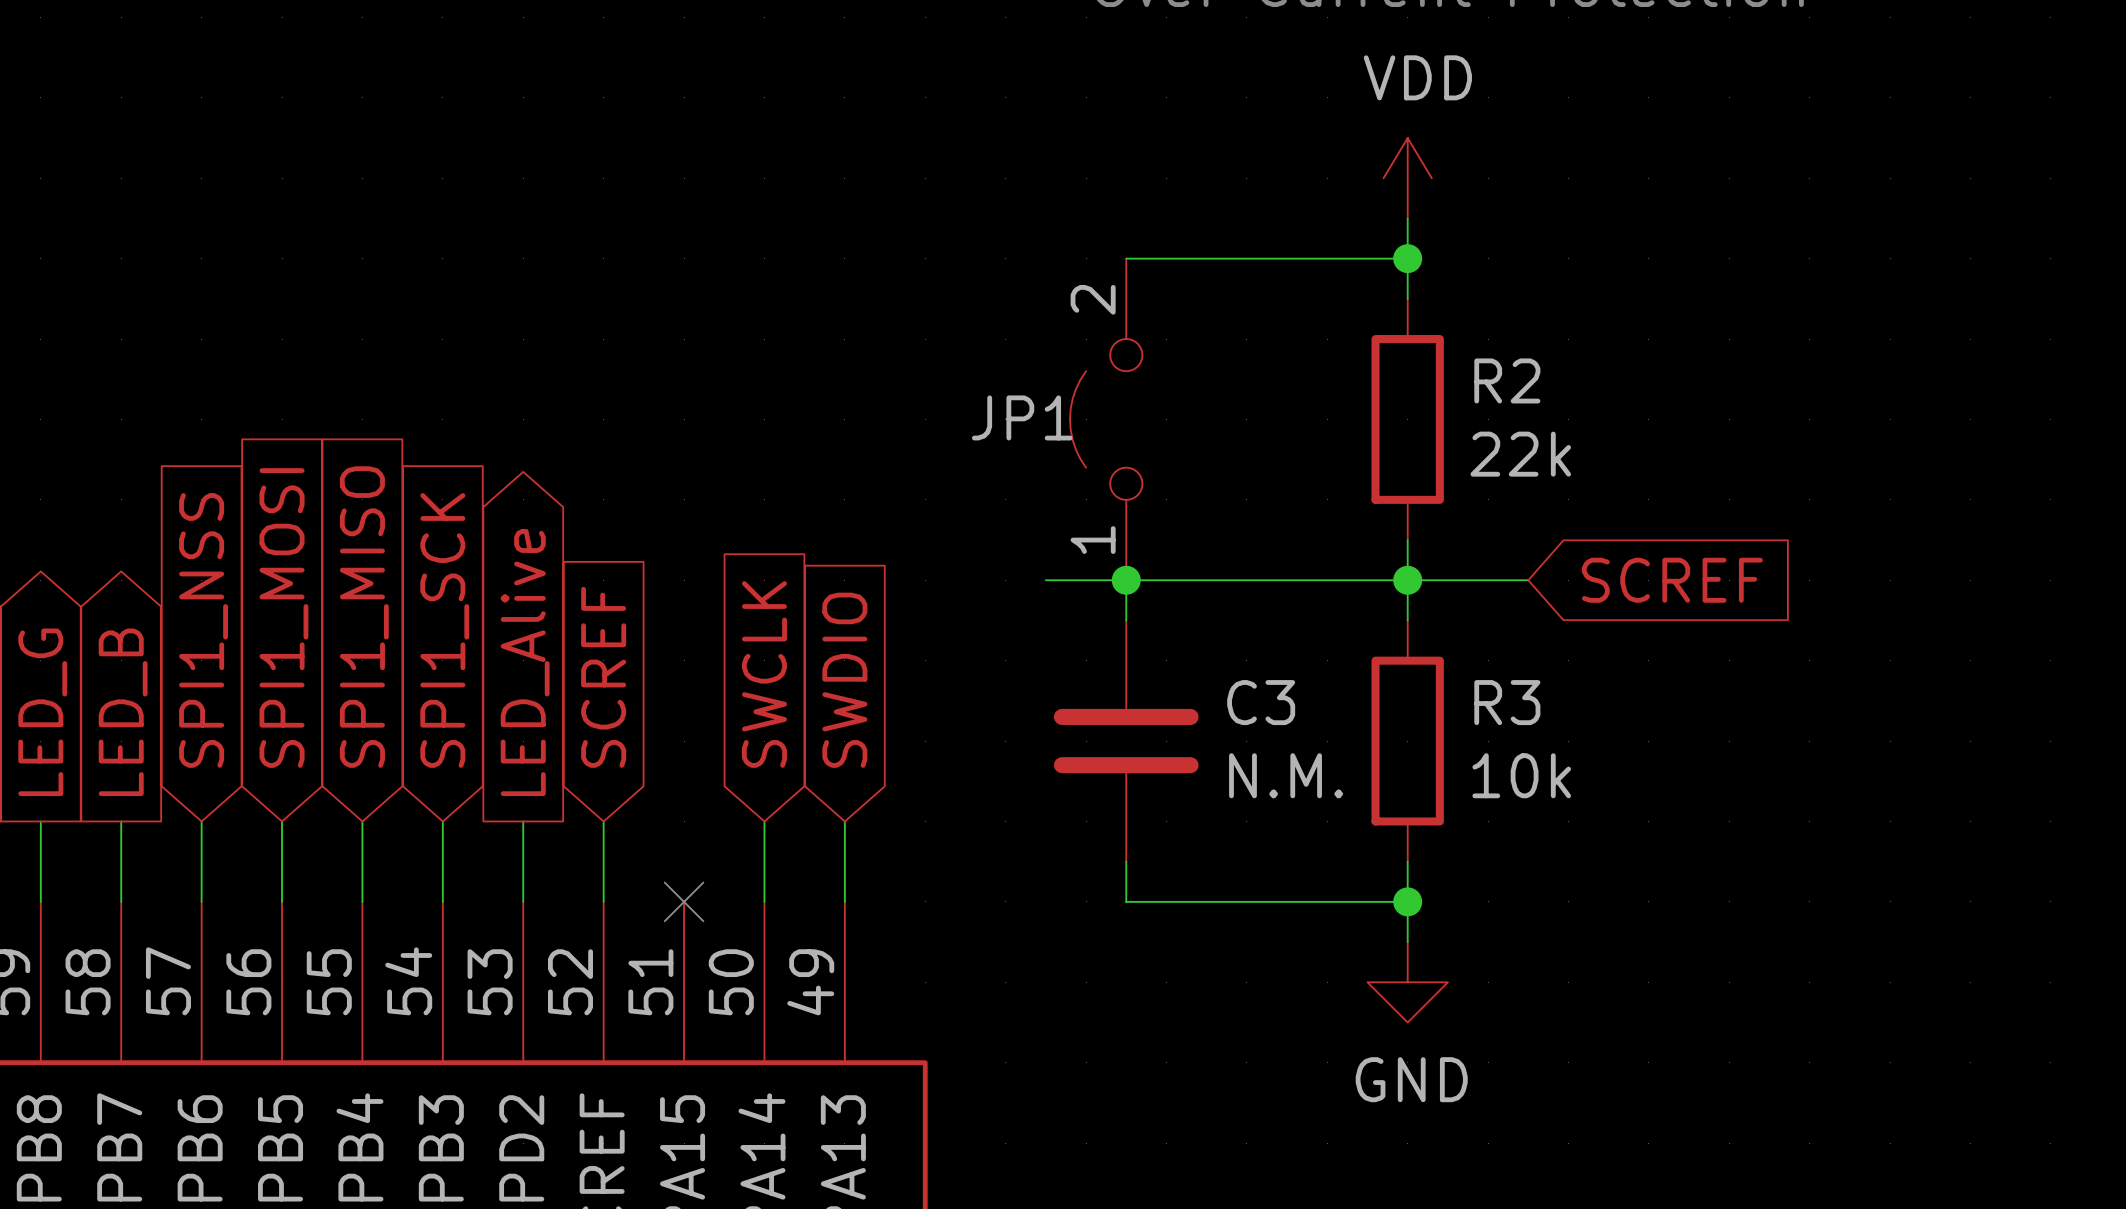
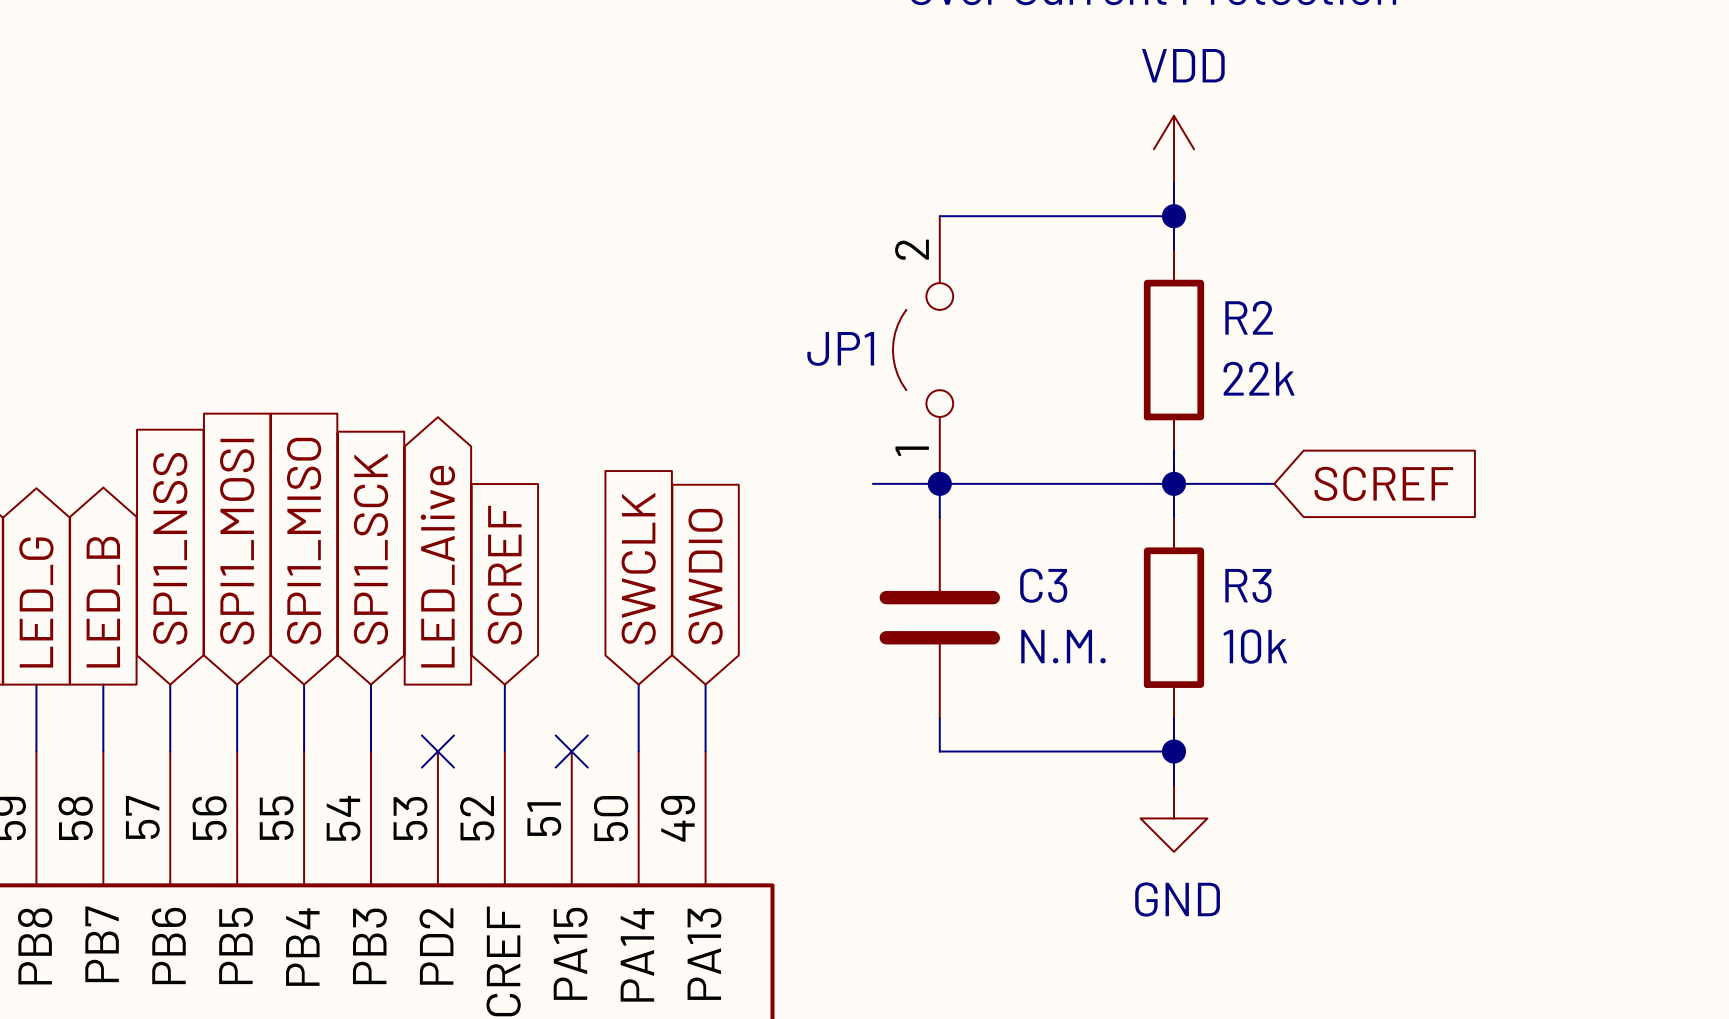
wire: (523, 821) (523, 901) -> none
no-connect mark: none -> (437, 751)

